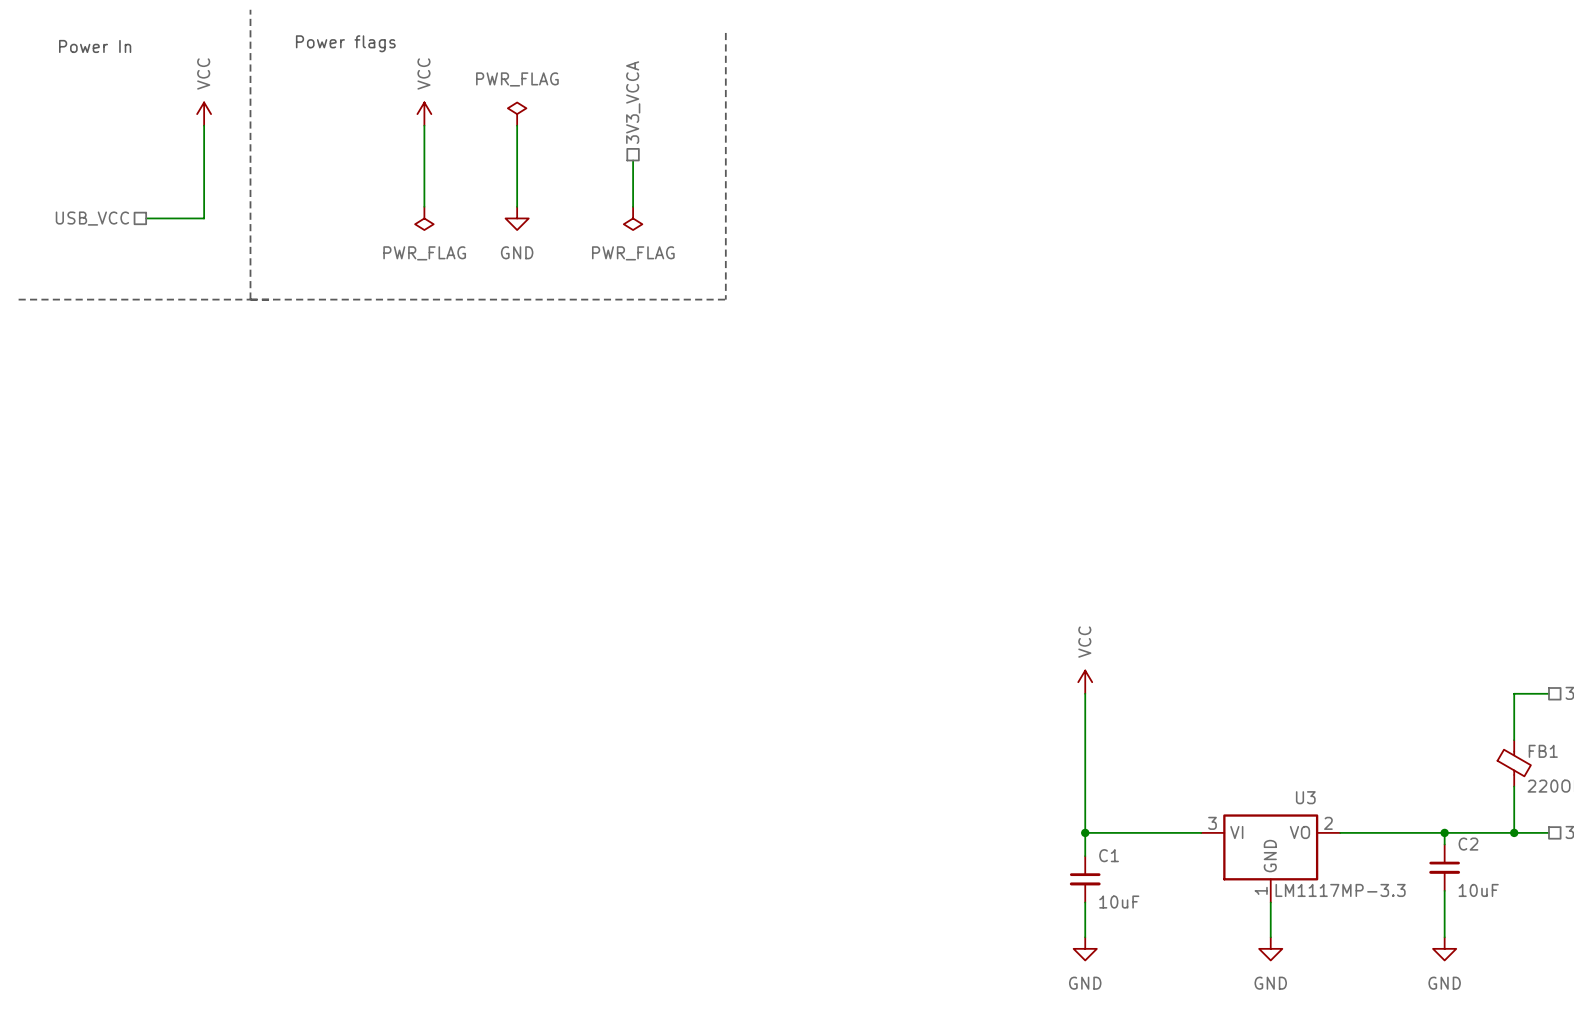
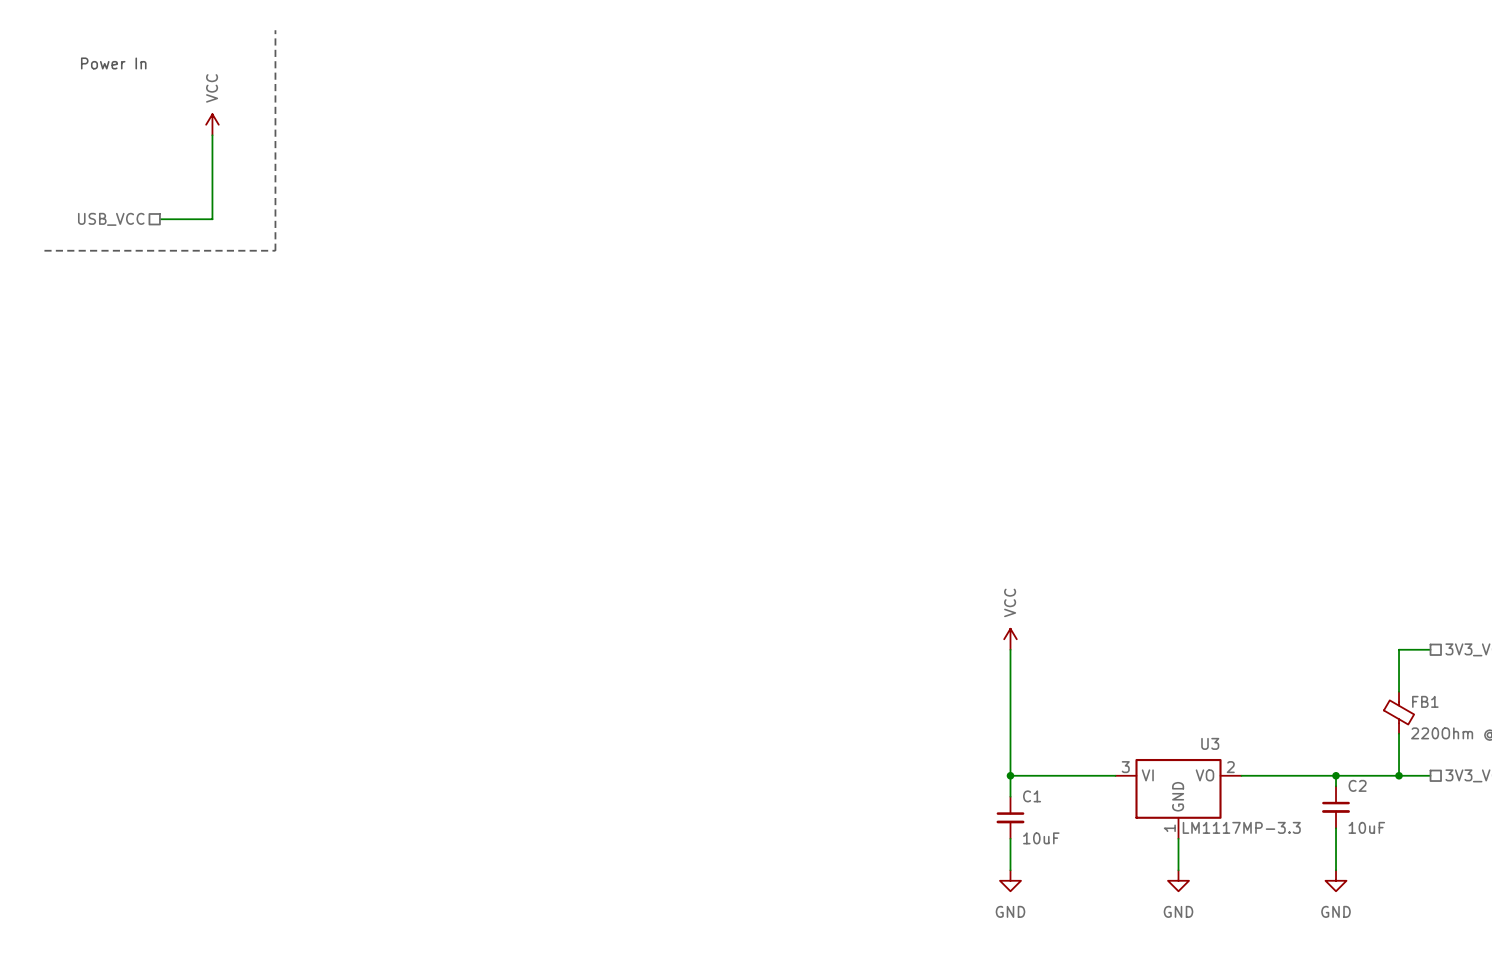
line: (250, 9) (250, 299) -> none
line: none -> (275, 30) (275, 250) (44, 250)
line: (725, 32) (725, 299) (18, 299) -> none
text: Power flags (345, 43) -> none
hierarchical label: 3V3_VCCA (633, 102) -> none
power symbol: VCC (424, 114) -> none
power symbol: PWR_FLAG (517, 114) -> none
wire: (424, 125) (424, 206) -> none
wire: (517, 125) (517, 206) -> none
wire: (633, 160) (633, 206) -> none
power symbol: PWR_FLAG (424, 218) -> none
power symbol: GND (517, 218) -> none
power symbol: PWR_FLAG (633, 218) -> none

